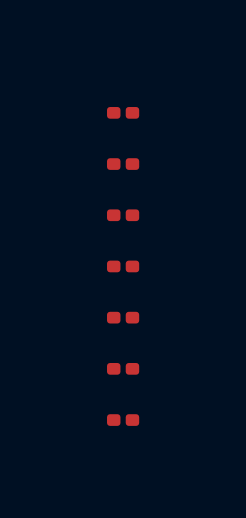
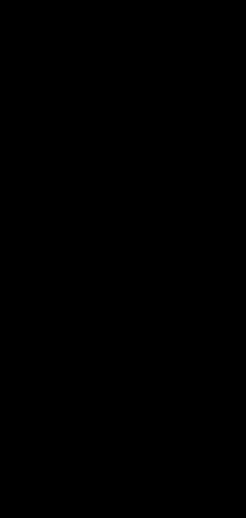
part: (123, 112) -> none
part: (123, 164) -> none
part: (123, 215) -> none
part: (123, 266) -> none
part: (123, 317) -> none
part: (123, 368) -> none
part: (123, 420) -> none

